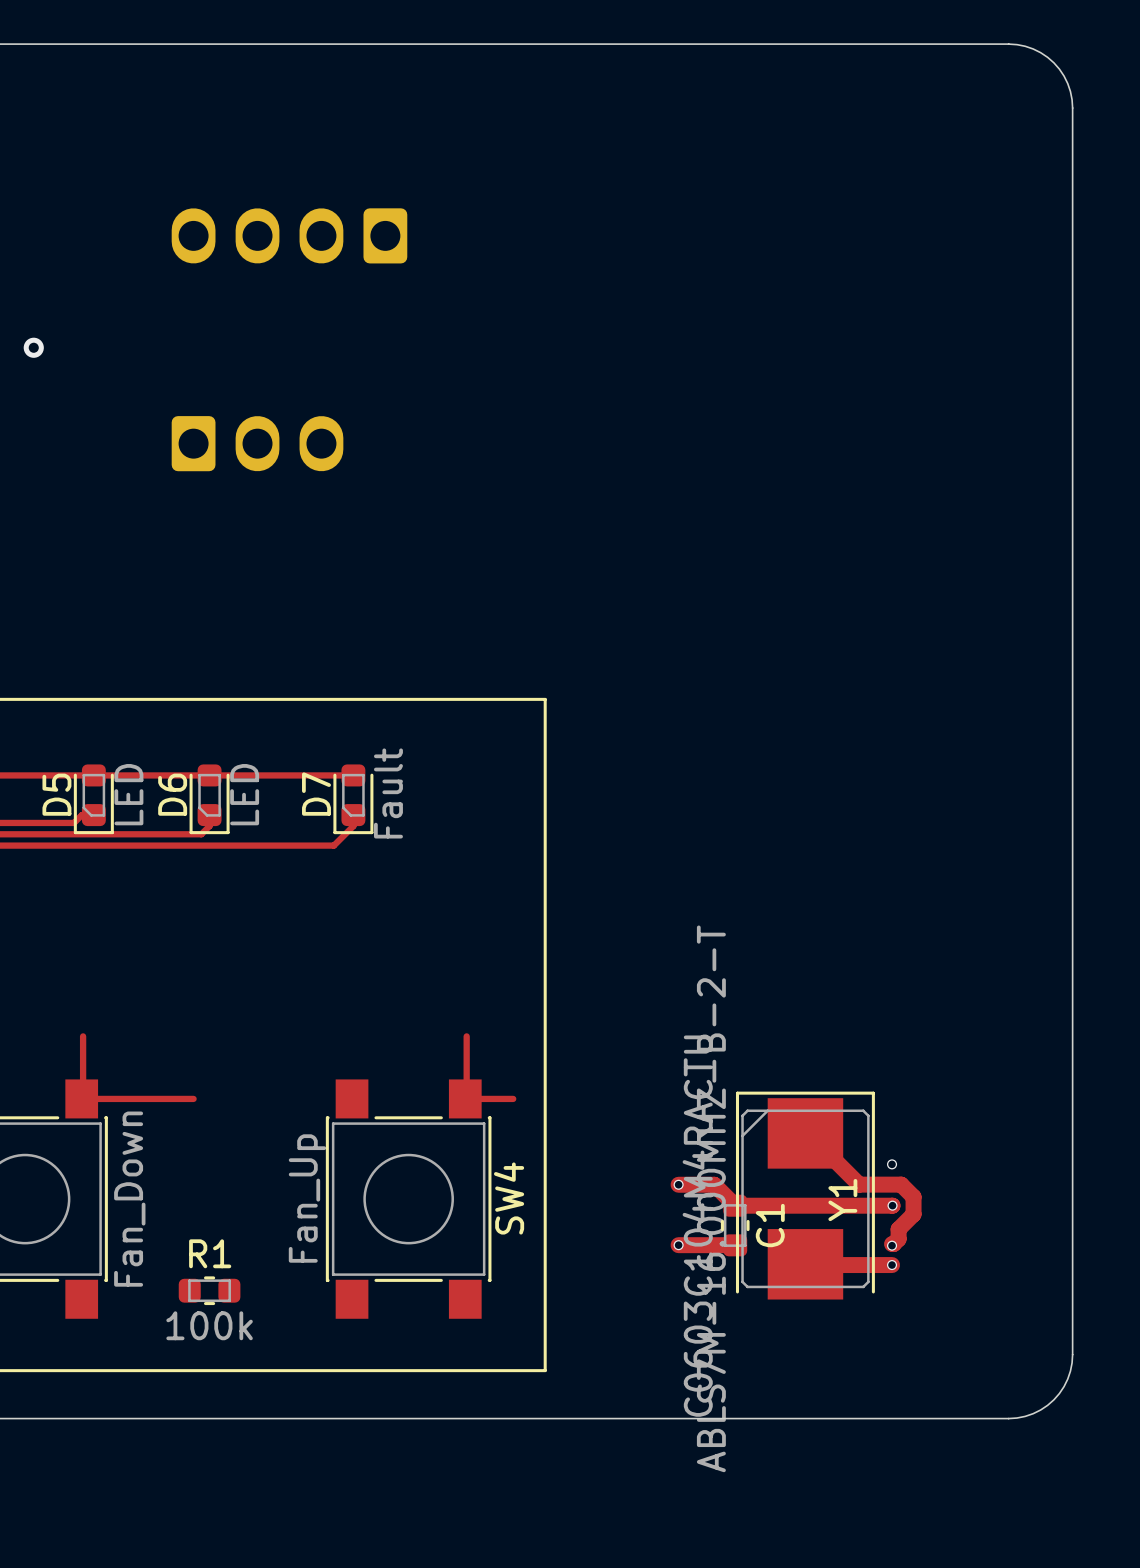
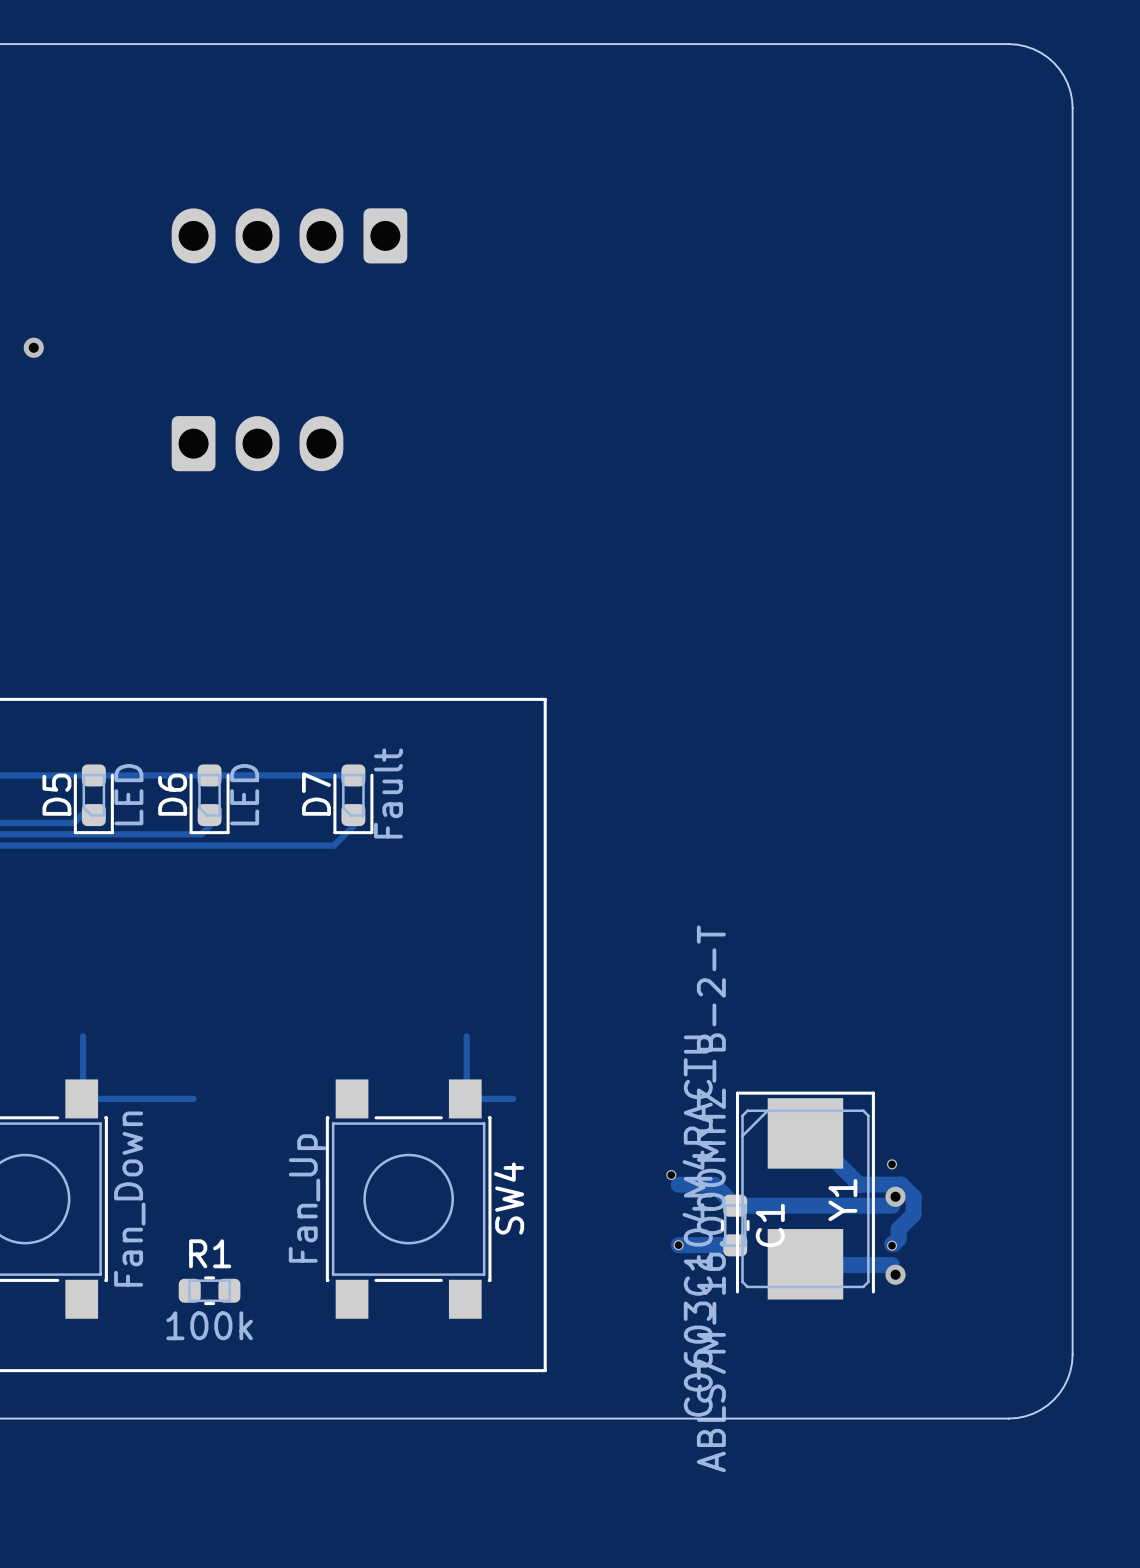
via position: (678, 1184) -> (671, 1175)
via size: [887, 1200, 898, 1211] -> [885, 1186, 906, 1207]
via size: [886, 1260, 898, 1271] -> [885, 1264, 906, 1285]

